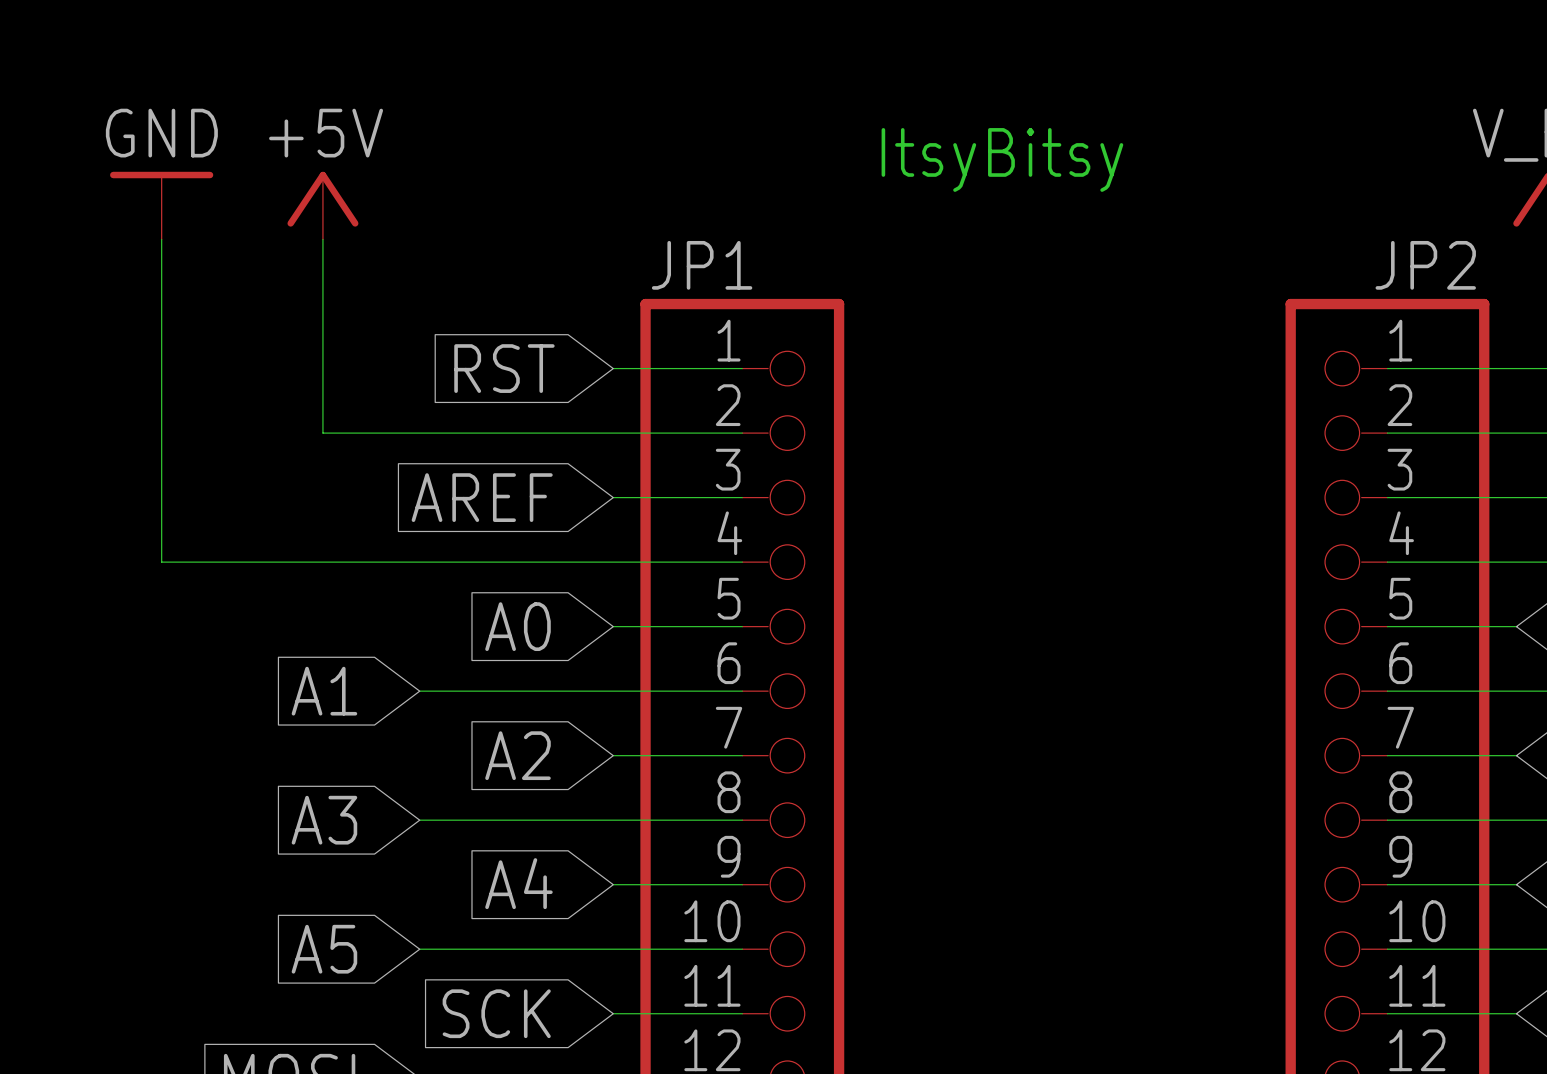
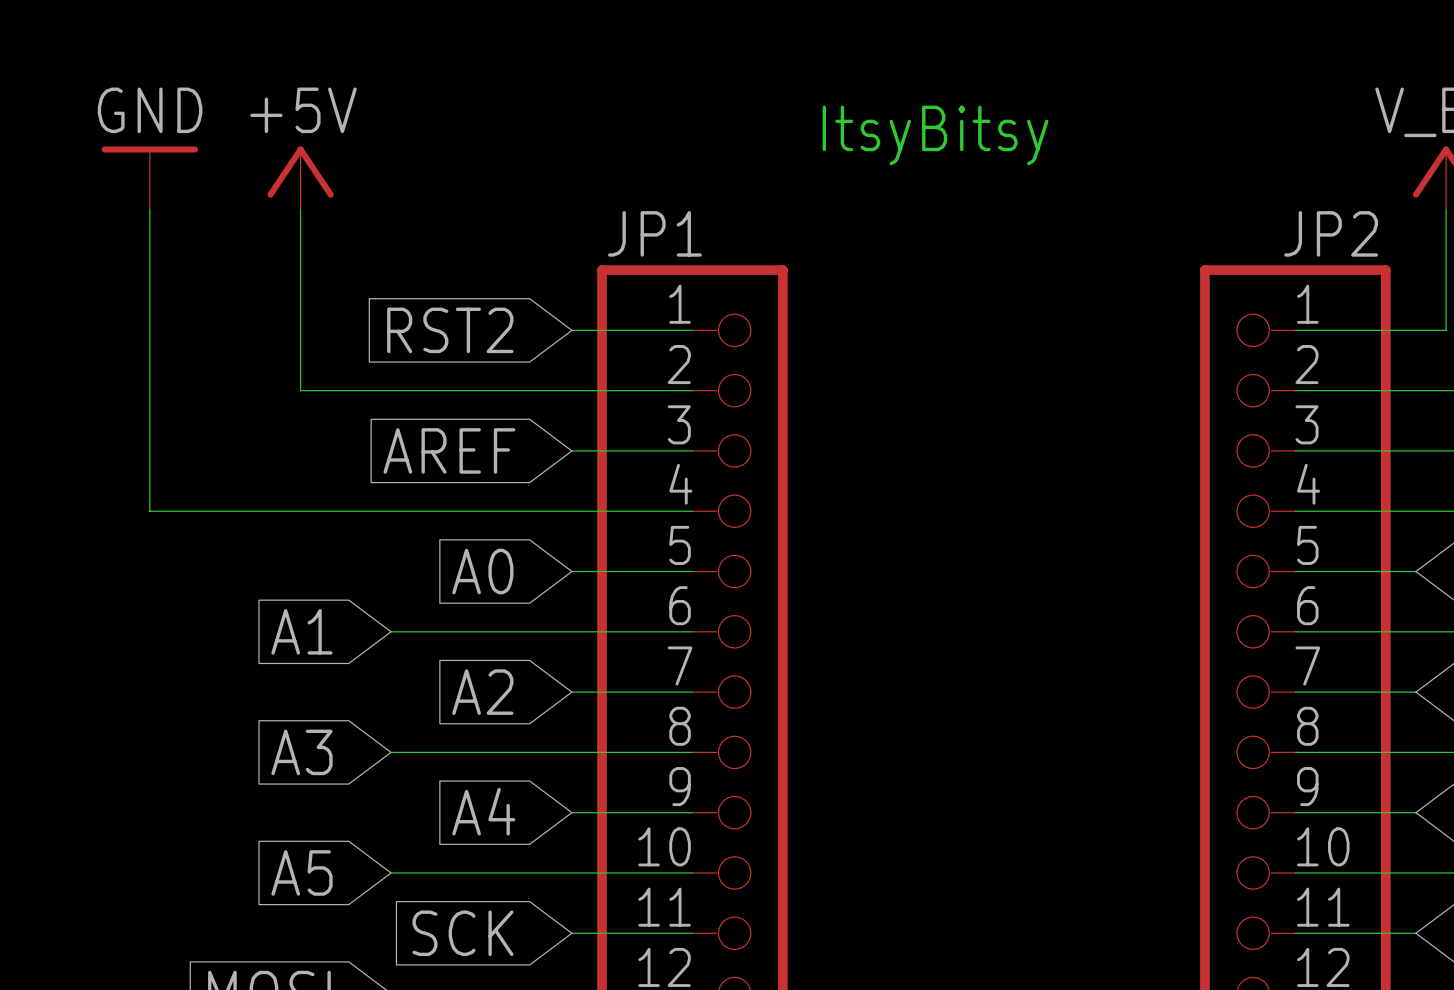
global label: RST (504, 368) -> RST2 (450, 330)

